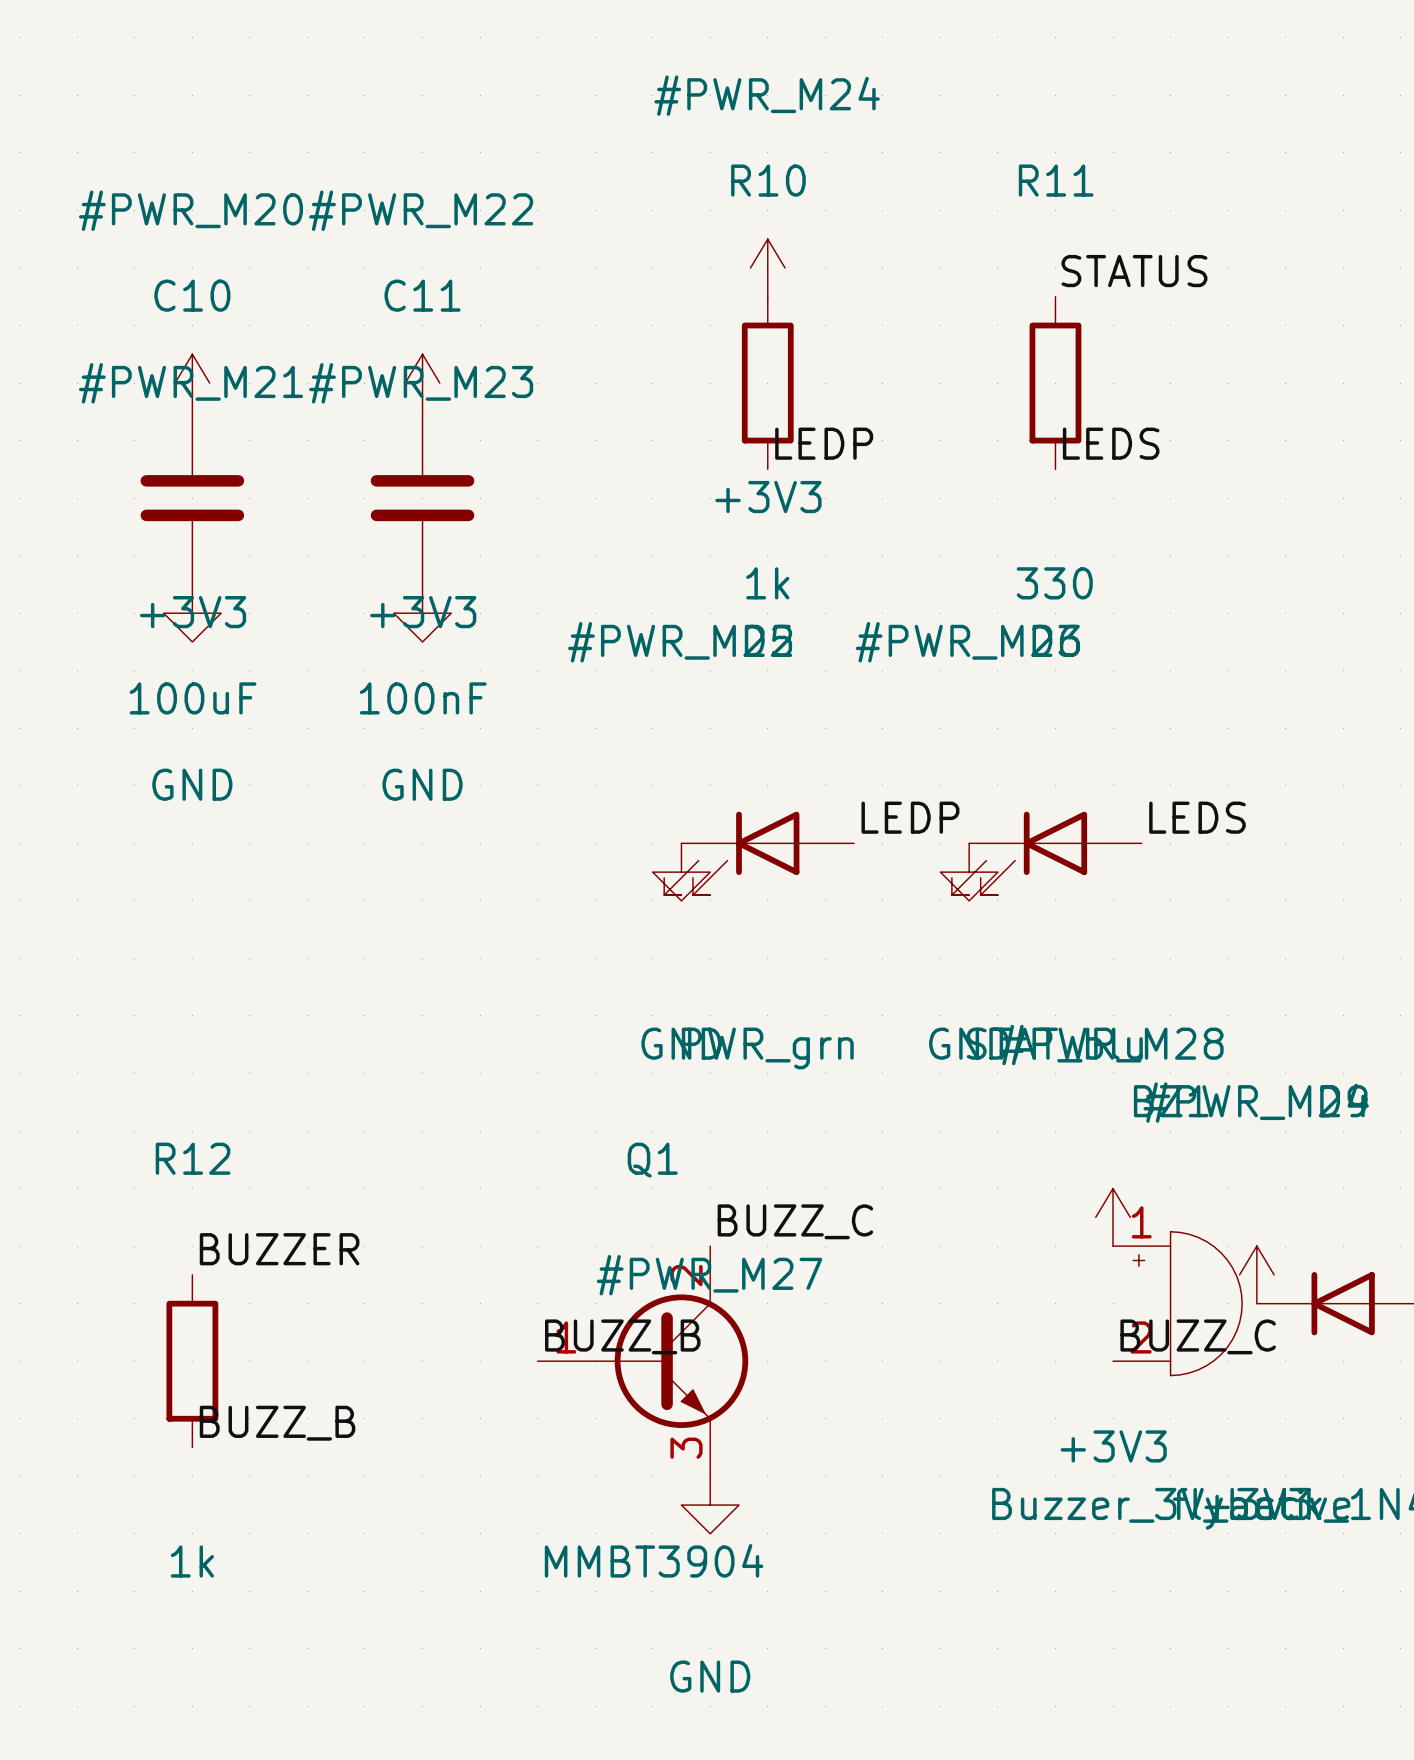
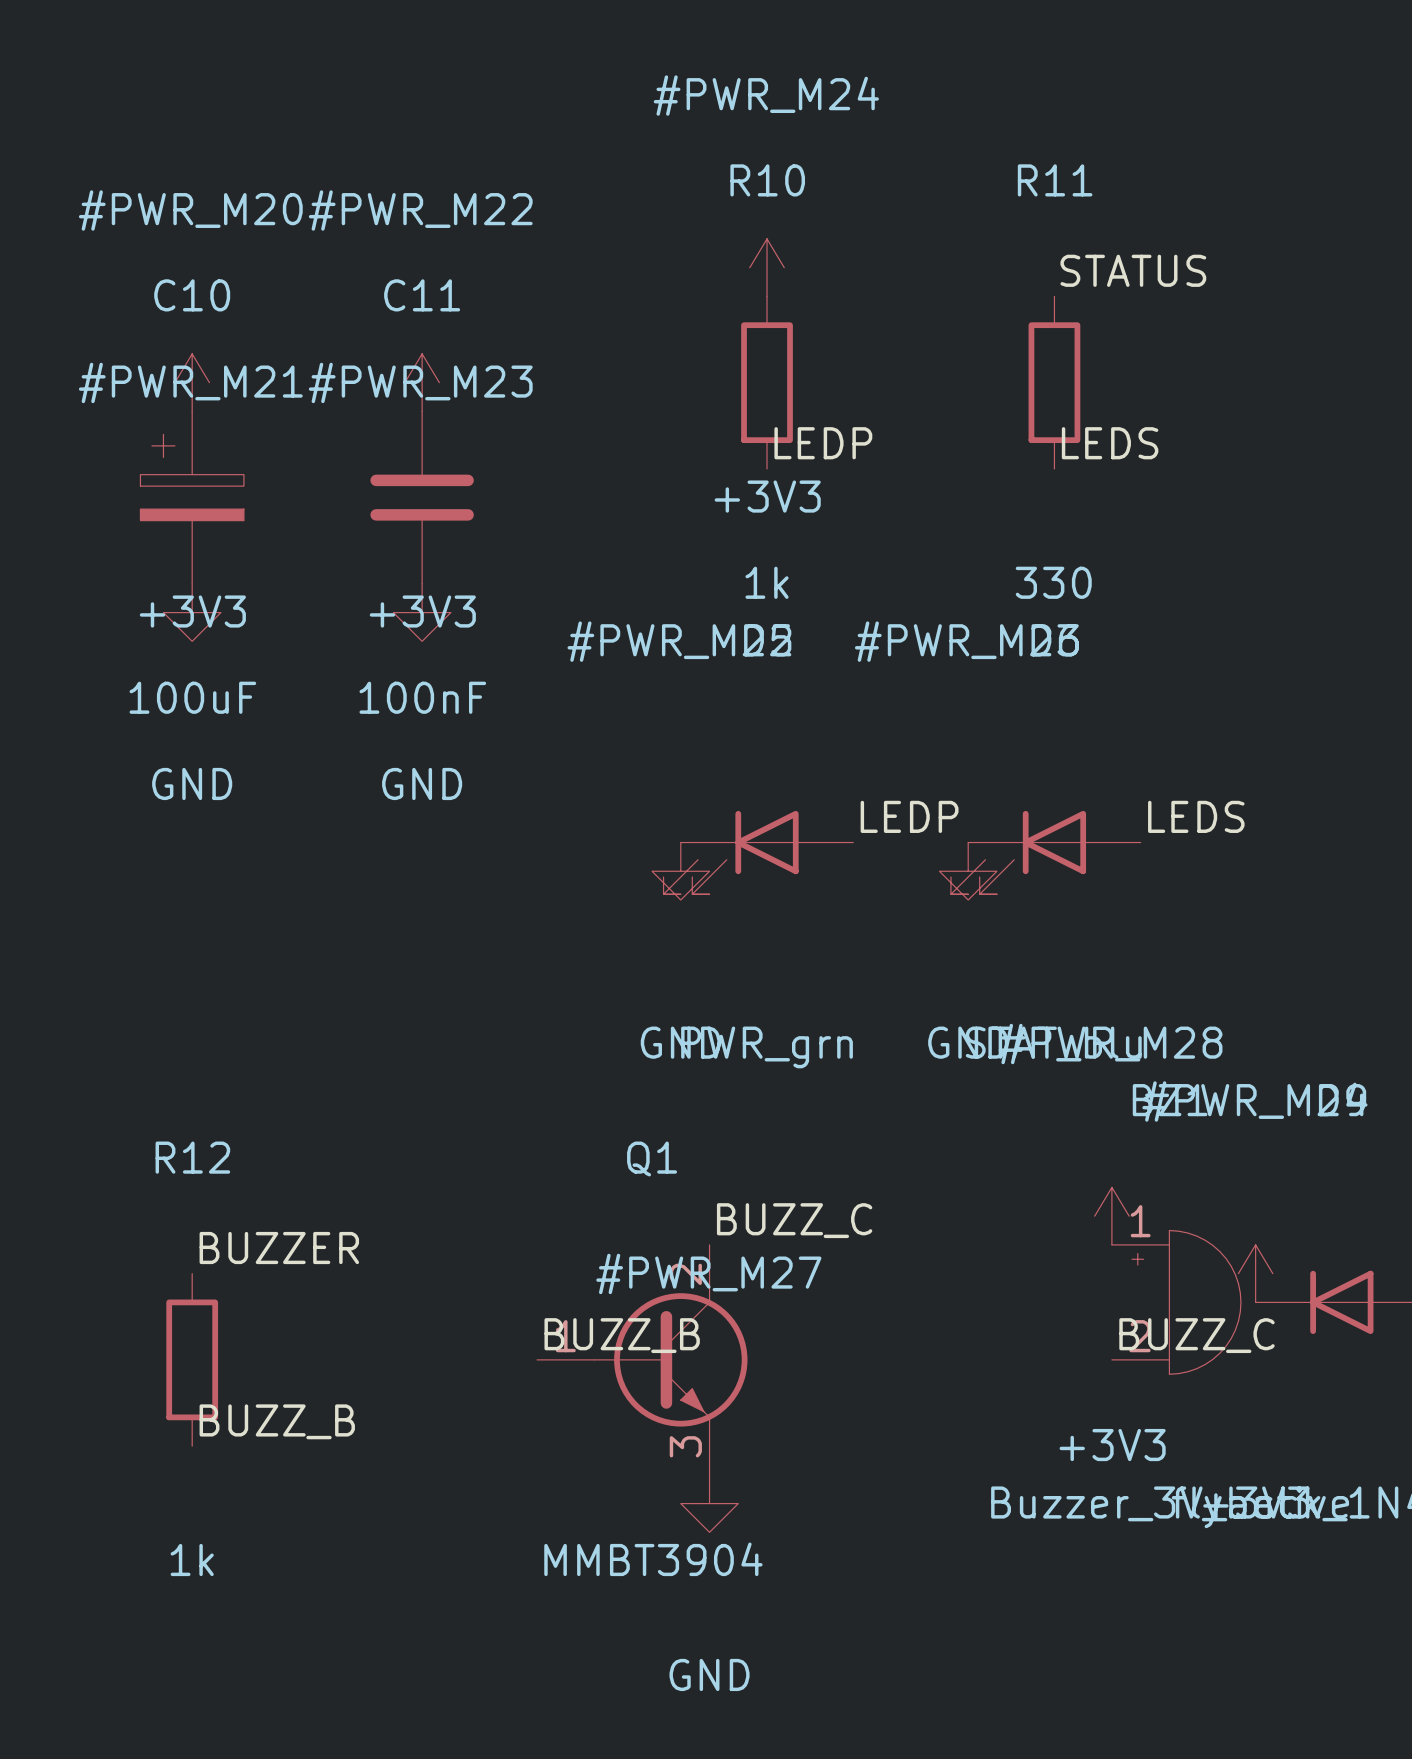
C10 symbol: [140, 411, 245, 585] -> [140, 411, 244, 584]

